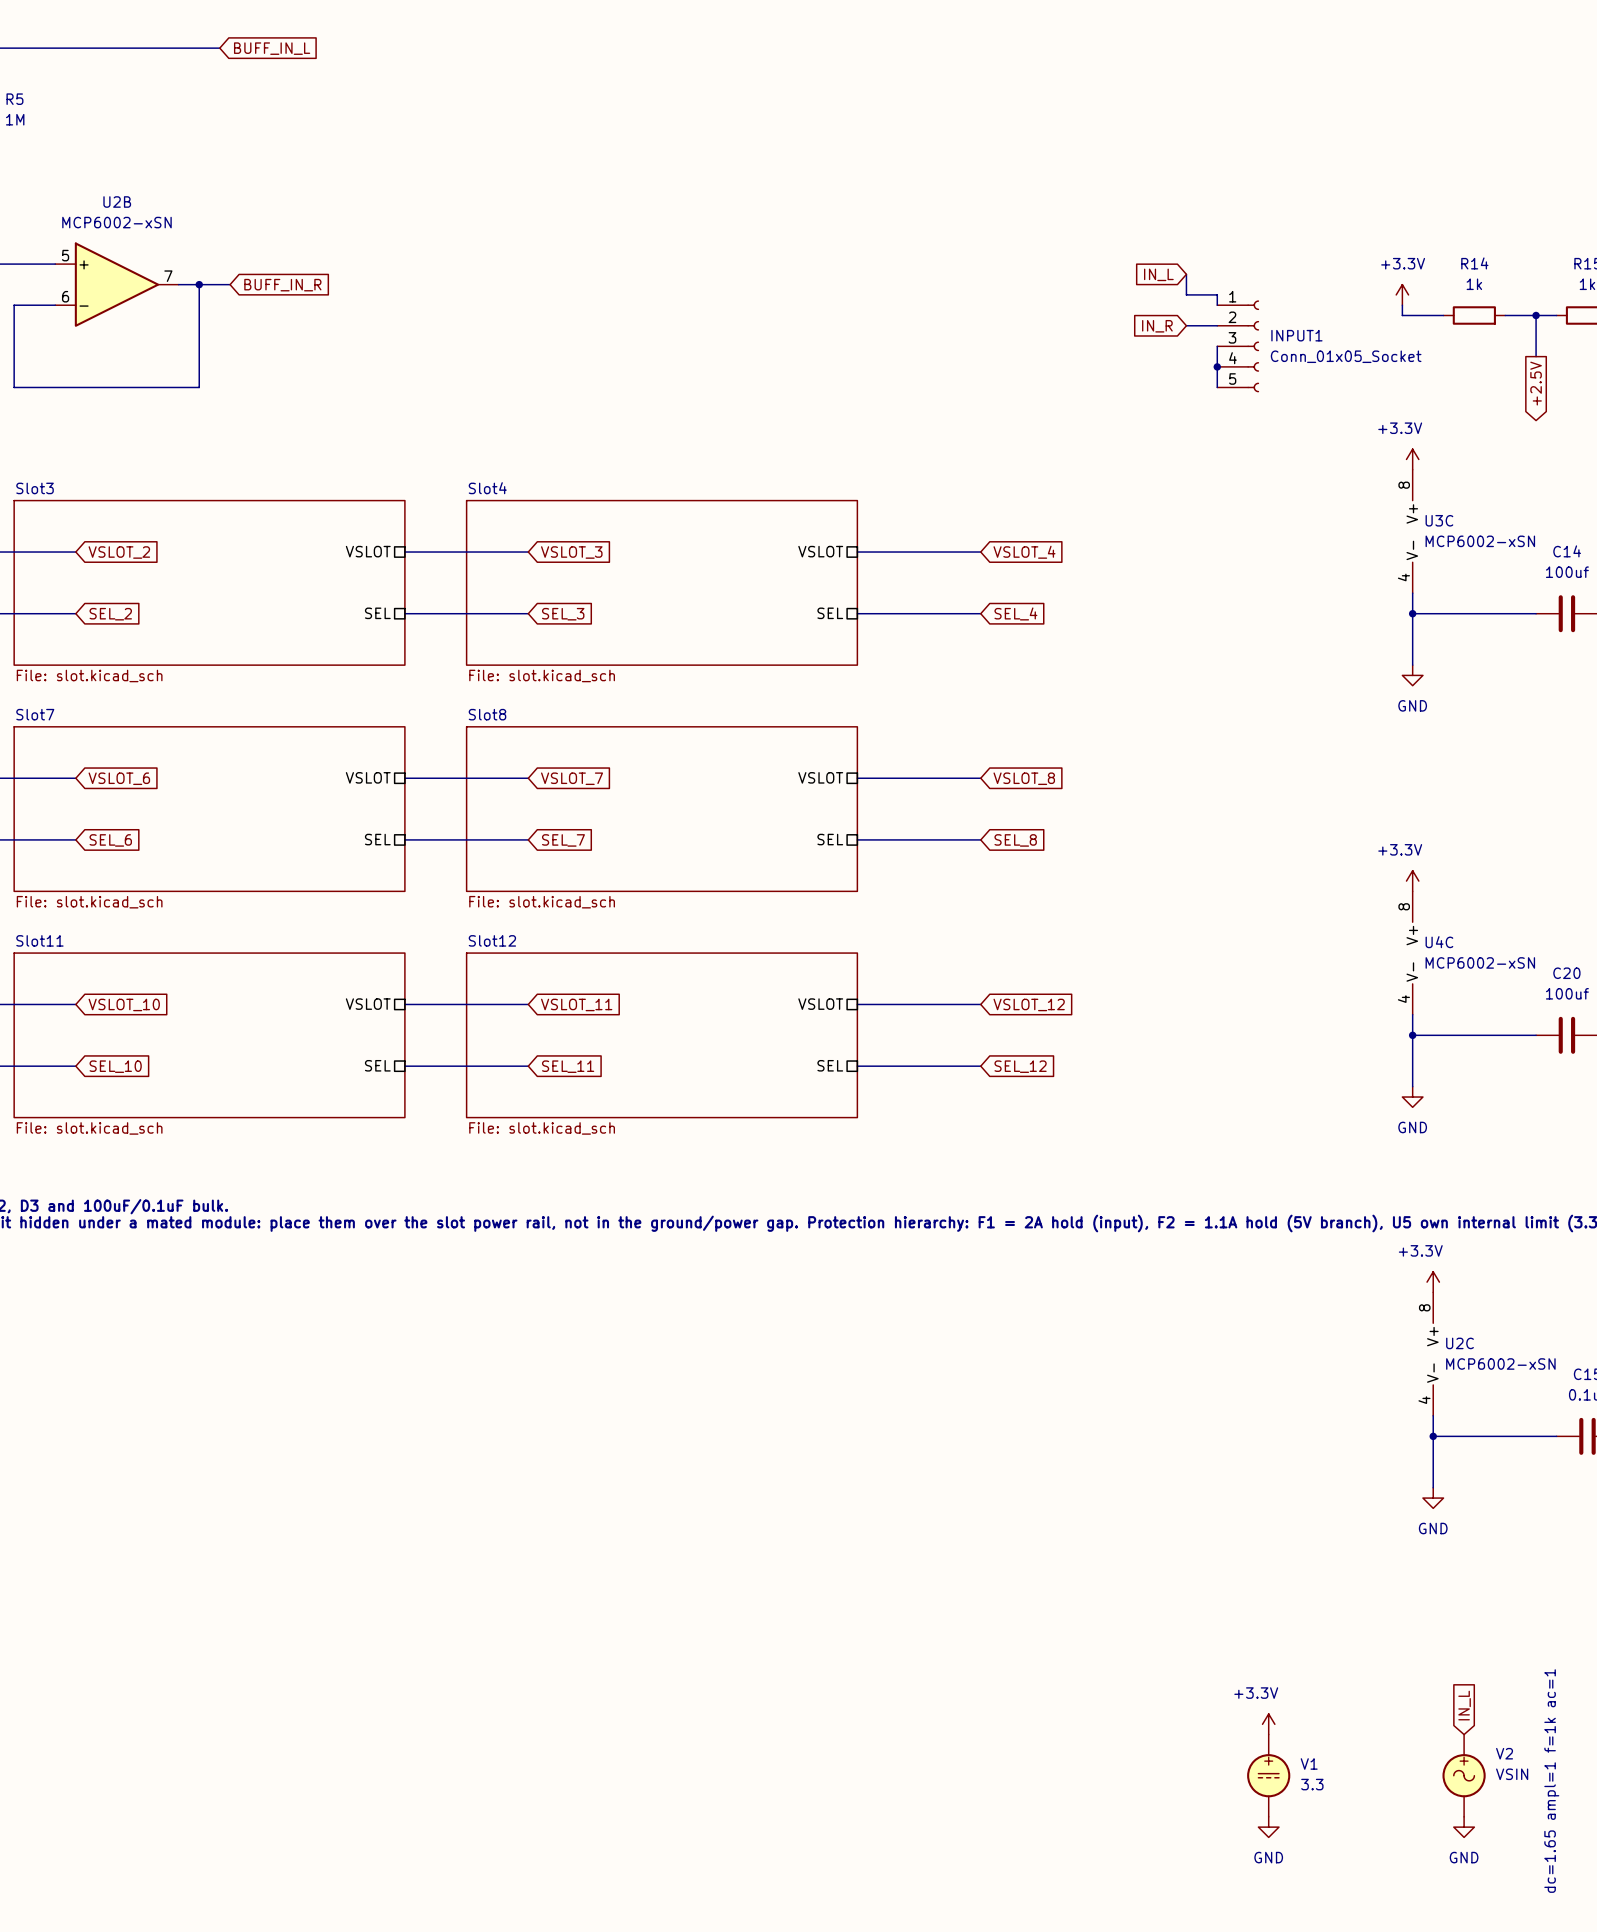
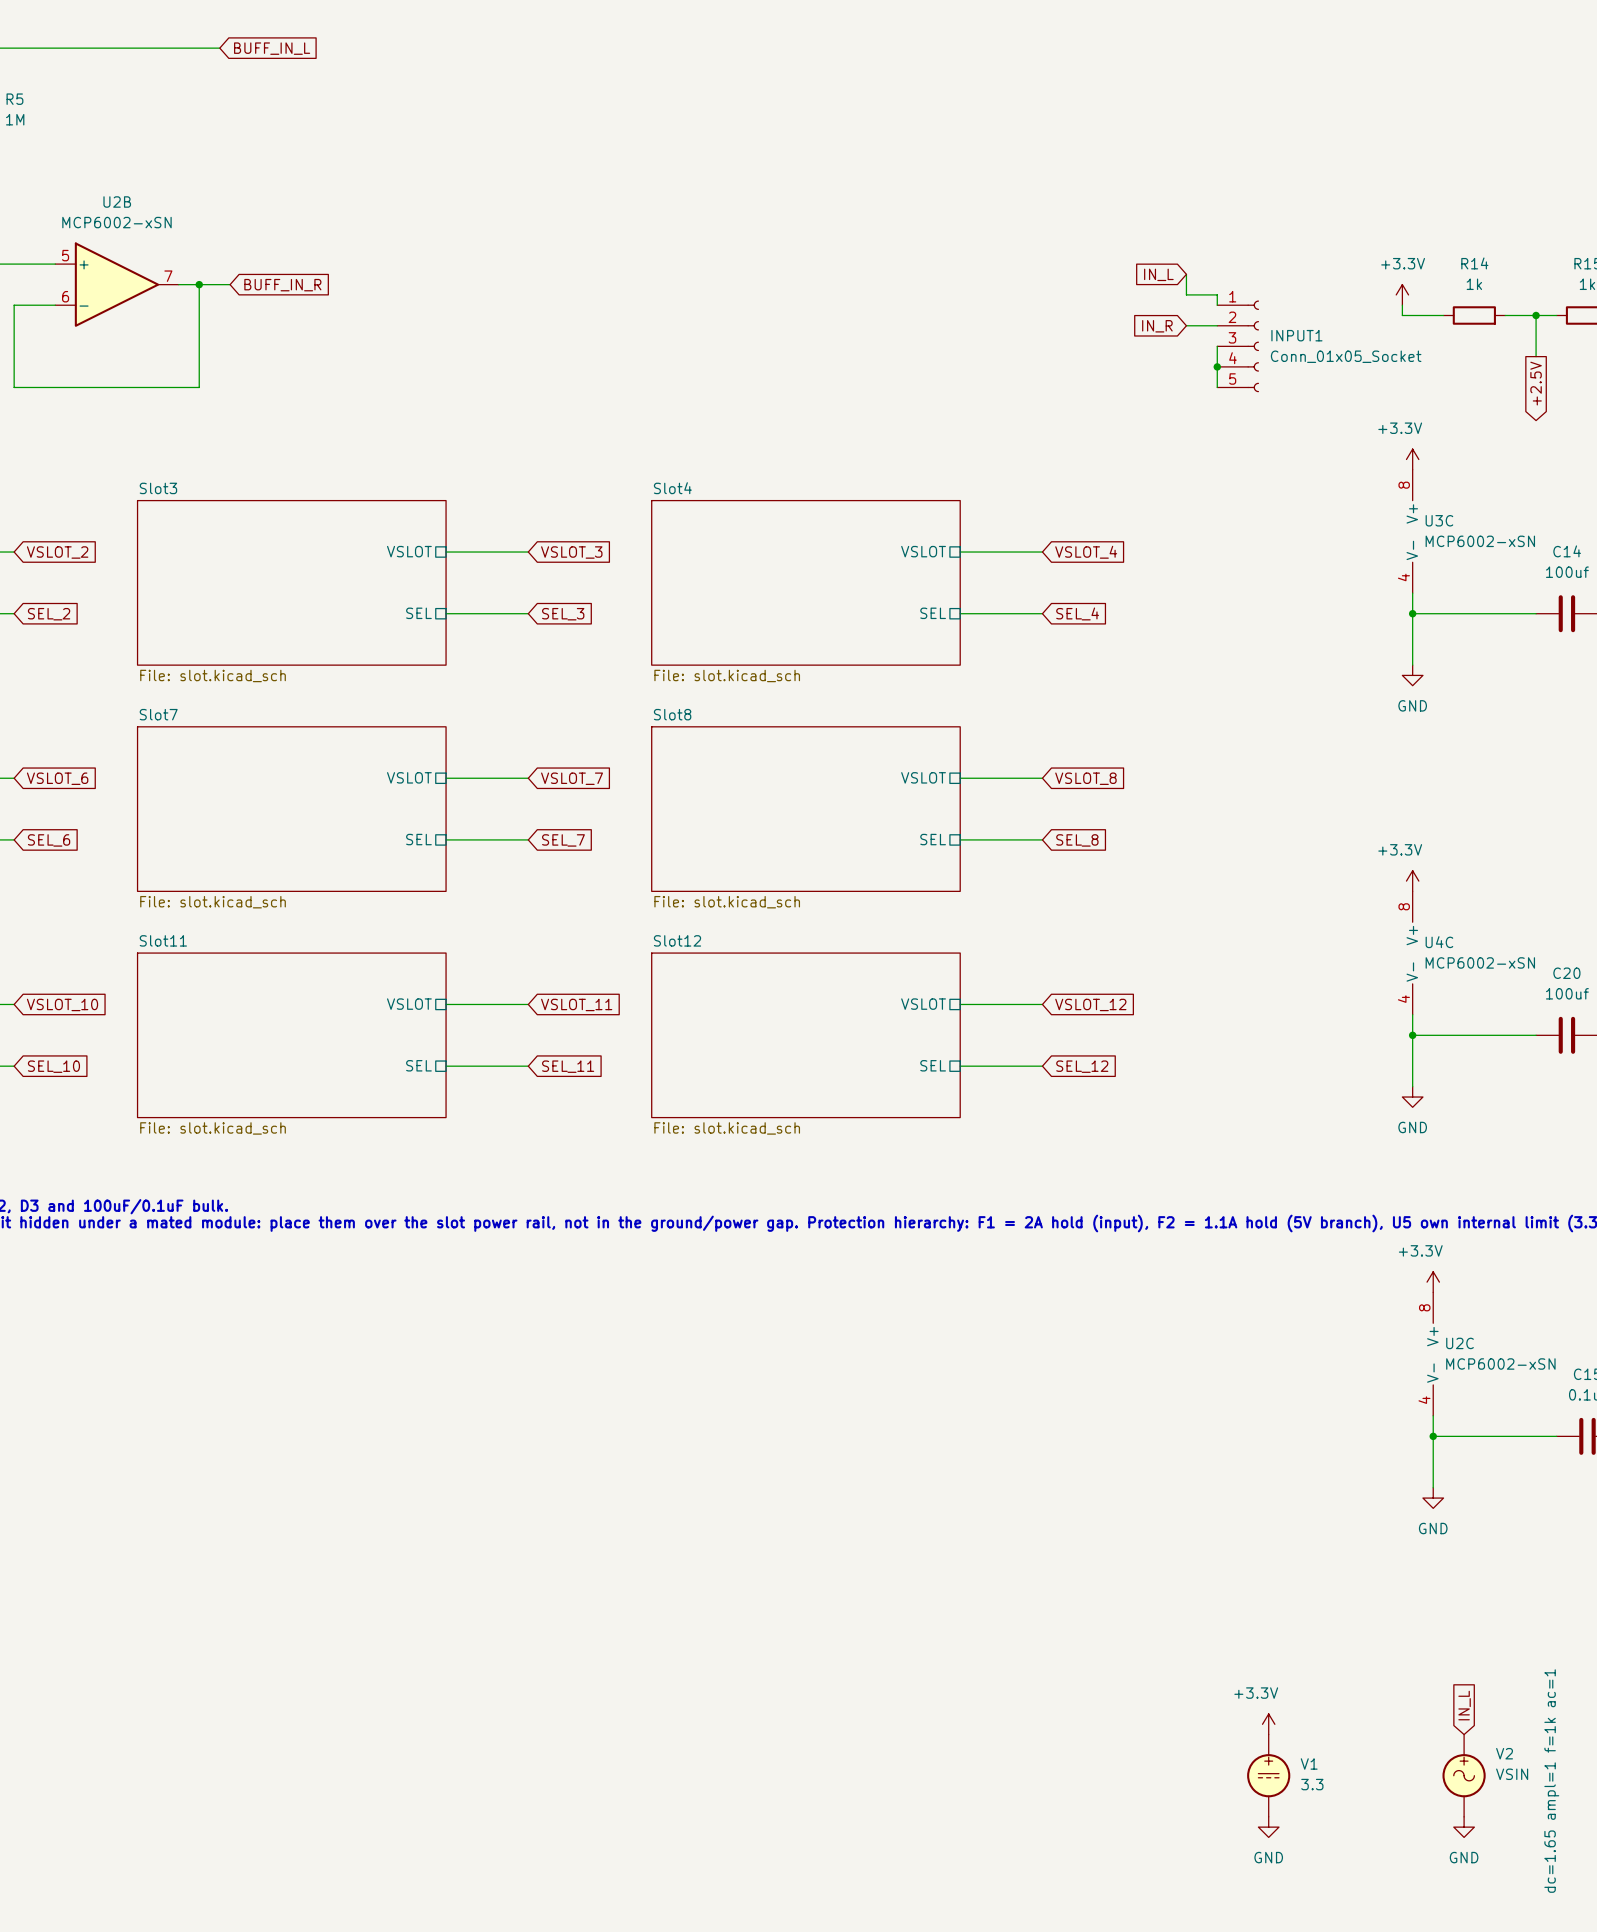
sheet Slot3 name position: Slot3 (35, 488) -> Slot3 (158, 488)
sheet Slot4 name position: Slot4 (487, 488) -> Slot4 (672, 488)
sheet Slot3 shape: [13, 499, 406, 666] -> [136, 499, 447, 666]
sheet Slot4 shape: [465, 499, 858, 666] -> [651, 499, 961, 666]
sheet pin position: VSLOT (368, 551) -> VSLOT (409, 551)
sheet pin position: VSLOT (820, 551) -> VSLOT (923, 551)
wire: (14, 552) (75, 552) -> none
global label position: VSLOT_2 (119, 552) -> VSLOT_2 (57, 552)
wire: (404, 552) (446, 552) -> none
wire: (857, 552) (960, 552) -> none
wire: none -> (980, 552) (1042, 552)
global label position: VSLOT_4 (1024, 552) -> VSLOT_4 (1086, 552)
wire: (14, 613) (75, 613) -> none
sheet pin position: SEL (377, 613) -> SEL (418, 613)
wire: (404, 613) (446, 613) -> none
sheet pin position: SEL (830, 613) -> SEL (933, 613)
wire: (857, 613) (960, 613) -> none
wire: none -> (980, 613) (1042, 613)
global label position: SEL_4 (1015, 613) -> SEL_4 (1077, 613)
global label position: SEL_2 (110, 614) -> SEL_2 (49, 614)
sheet Slot3 value position: File: slot.kicad_sch (89, 675) -> File: slot.kicad_sch (213, 675)
sheet Slot4 value position: File: slot.kicad_sch (542, 675) -> File: slot.kicad_sch (727, 675)
sheet Slot7 name position: Slot7 (35, 714) -> Slot7 (158, 714)
sheet Slot8 name position: Slot8 (487, 714) -> Slot8 (672, 714)
sheet Slot7 shape: [13, 726, 406, 892] -> [136, 726, 447, 892]
sheet Slot8 shape: [465, 726, 858, 892] -> [651, 726, 961, 892]
sheet pin position: VSLOT (368, 777) -> VSLOT (409, 777)
sheet pin position: VSLOT (820, 777) -> VSLOT (923, 777)
wire: (14, 778) (75, 778) -> none
global label position: VSLOT_6 (119, 778) -> VSLOT_6 (57, 778)
wire: (404, 778) (446, 778) -> none
wire: (857, 778) (960, 778) -> none
wire: none -> (980, 778) (1042, 778)
global label position: VSLOT_8 (1024, 778) -> VSLOT_8 (1085, 778)
wire: (14, 839) (75, 839) -> none
sheet pin position: SEL (377, 839) -> SEL (418, 839)
wire: (404, 839) (446, 839) -> none
sheet pin position: SEL (830, 839) -> SEL (933, 839)
wire: (857, 839) (960, 839) -> none
wire: none -> (980, 839) (1042, 839)
global label position: SEL_6 (110, 840) -> SEL_6 (49, 840)
global label position: SEL_8 (1015, 840) -> SEL_8 (1077, 840)
sheet Slot7 value position: File: slot.kicad_sch (89, 902) -> File: slot.kicad_sch (213, 902)
sheet Slot8 value position: File: slot.kicad_sch (542, 902) -> File: slot.kicad_sch (727, 902)
sheet Slot11 name position: Slot11 (39, 940) -> Slot11 (163, 940)
sheet Slot12 name position: Slot12 (492, 940) -> Slot12 (677, 940)
sheet Slot11 shape: [13, 952, 406, 1119] -> [136, 952, 447, 1119]
sheet Slot12 shape: [465, 952, 858, 1119] -> [651, 952, 961, 1119]
wire: (14, 1004) (75, 1004) -> none
global label position: VSLOT_10 (124, 1004) -> VSLOT_10 (62, 1004)
sheet pin position: VSLOT (368, 1004) -> VSLOT (409, 1004)
wire: (404, 1004) (446, 1004) -> none
sheet pin position: VSLOT (820, 1004) -> VSLOT (923, 1004)
wire: (857, 1004) (960, 1004) -> none
wire: none -> (980, 1004) (1042, 1004)
global label position: VSLOT_12 (1029, 1004) -> VSLOT_12 (1090, 1004)
sheet pin position: SEL (377, 1065) -> SEL (418, 1065)
sheet pin position: SEL (830, 1065) -> SEL (933, 1065)
wire: (14, 1066) (75, 1066) -> none
global label position: SEL_10 (115, 1066) -> SEL_10 (53, 1066)
wire: (404, 1066) (446, 1066) -> none
wire: (857, 1066) (960, 1066) -> none
wire: none -> (980, 1066) (1042, 1066)
global label position: SEL_12 (1020, 1066) -> SEL_12 (1082, 1066)
sheet Slot11 value position: File: slot.kicad_sch (89, 1128) -> File: slot.kicad_sch (213, 1128)
sheet Slot12 value position: File: slot.kicad_sch (542, 1128) -> File: slot.kicad_sch (727, 1128)

